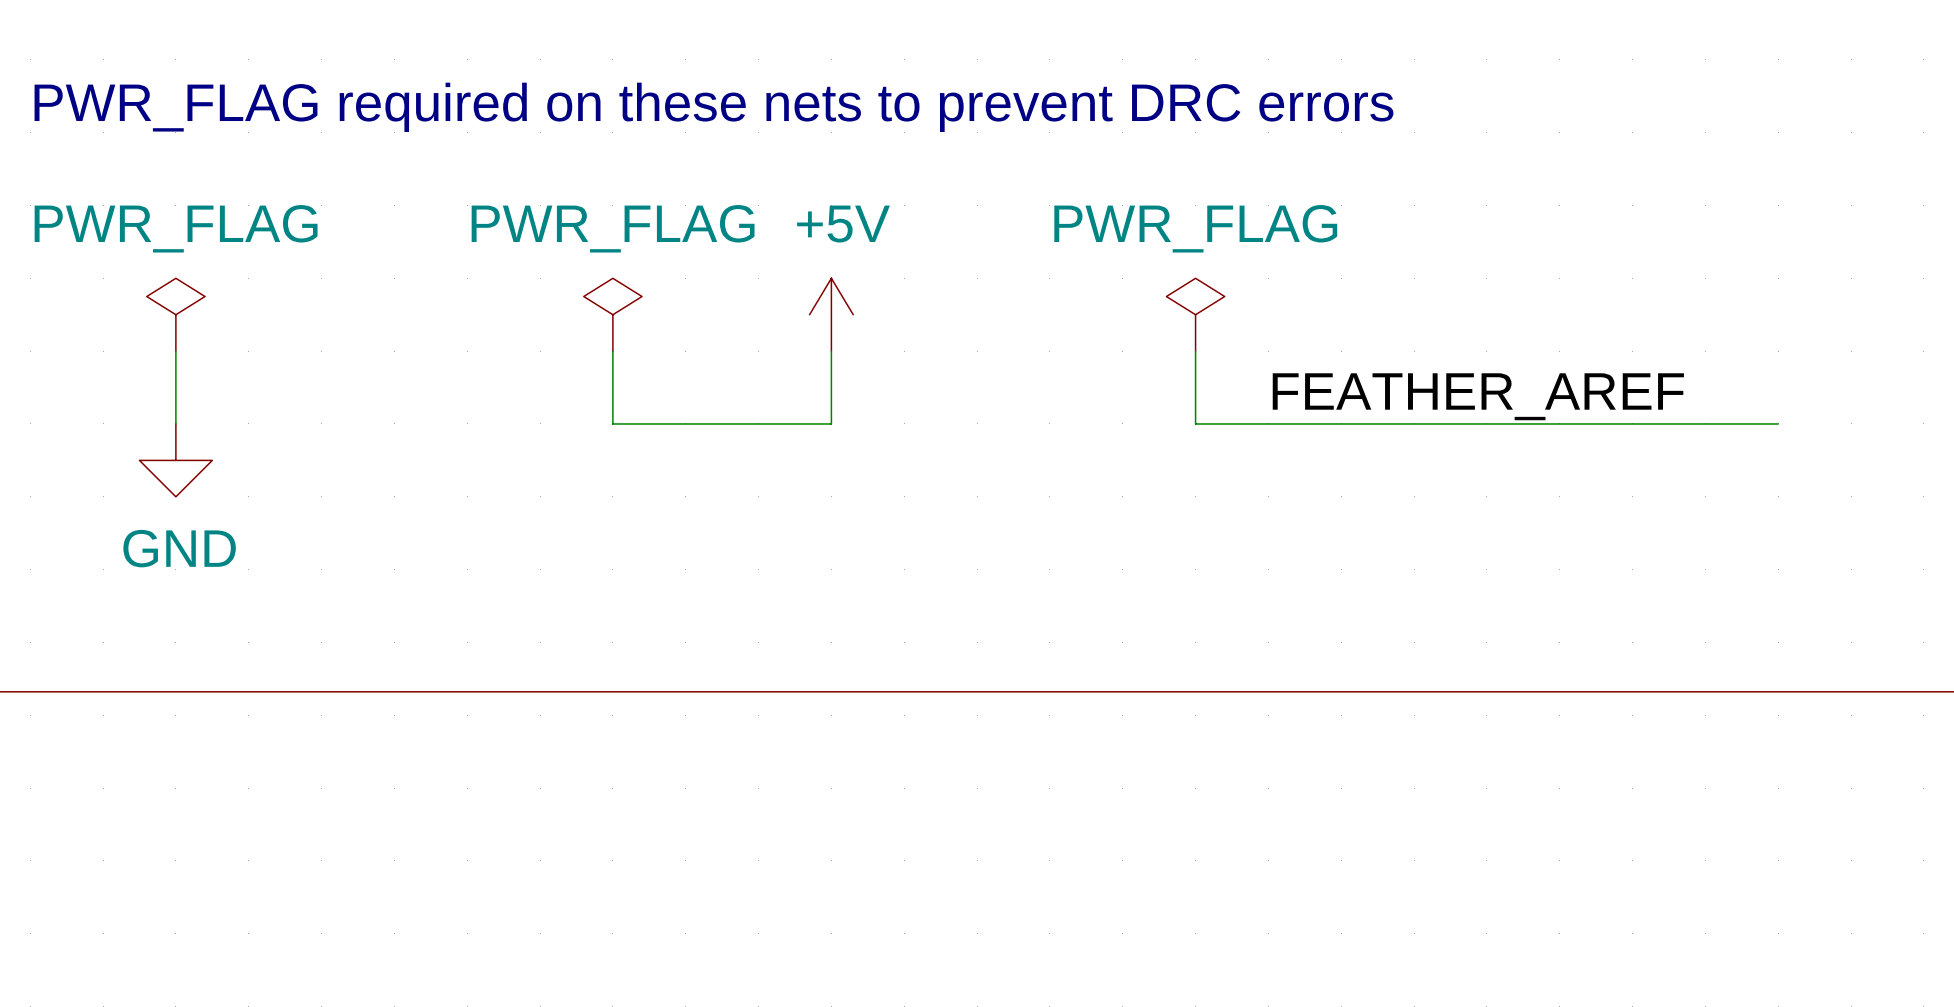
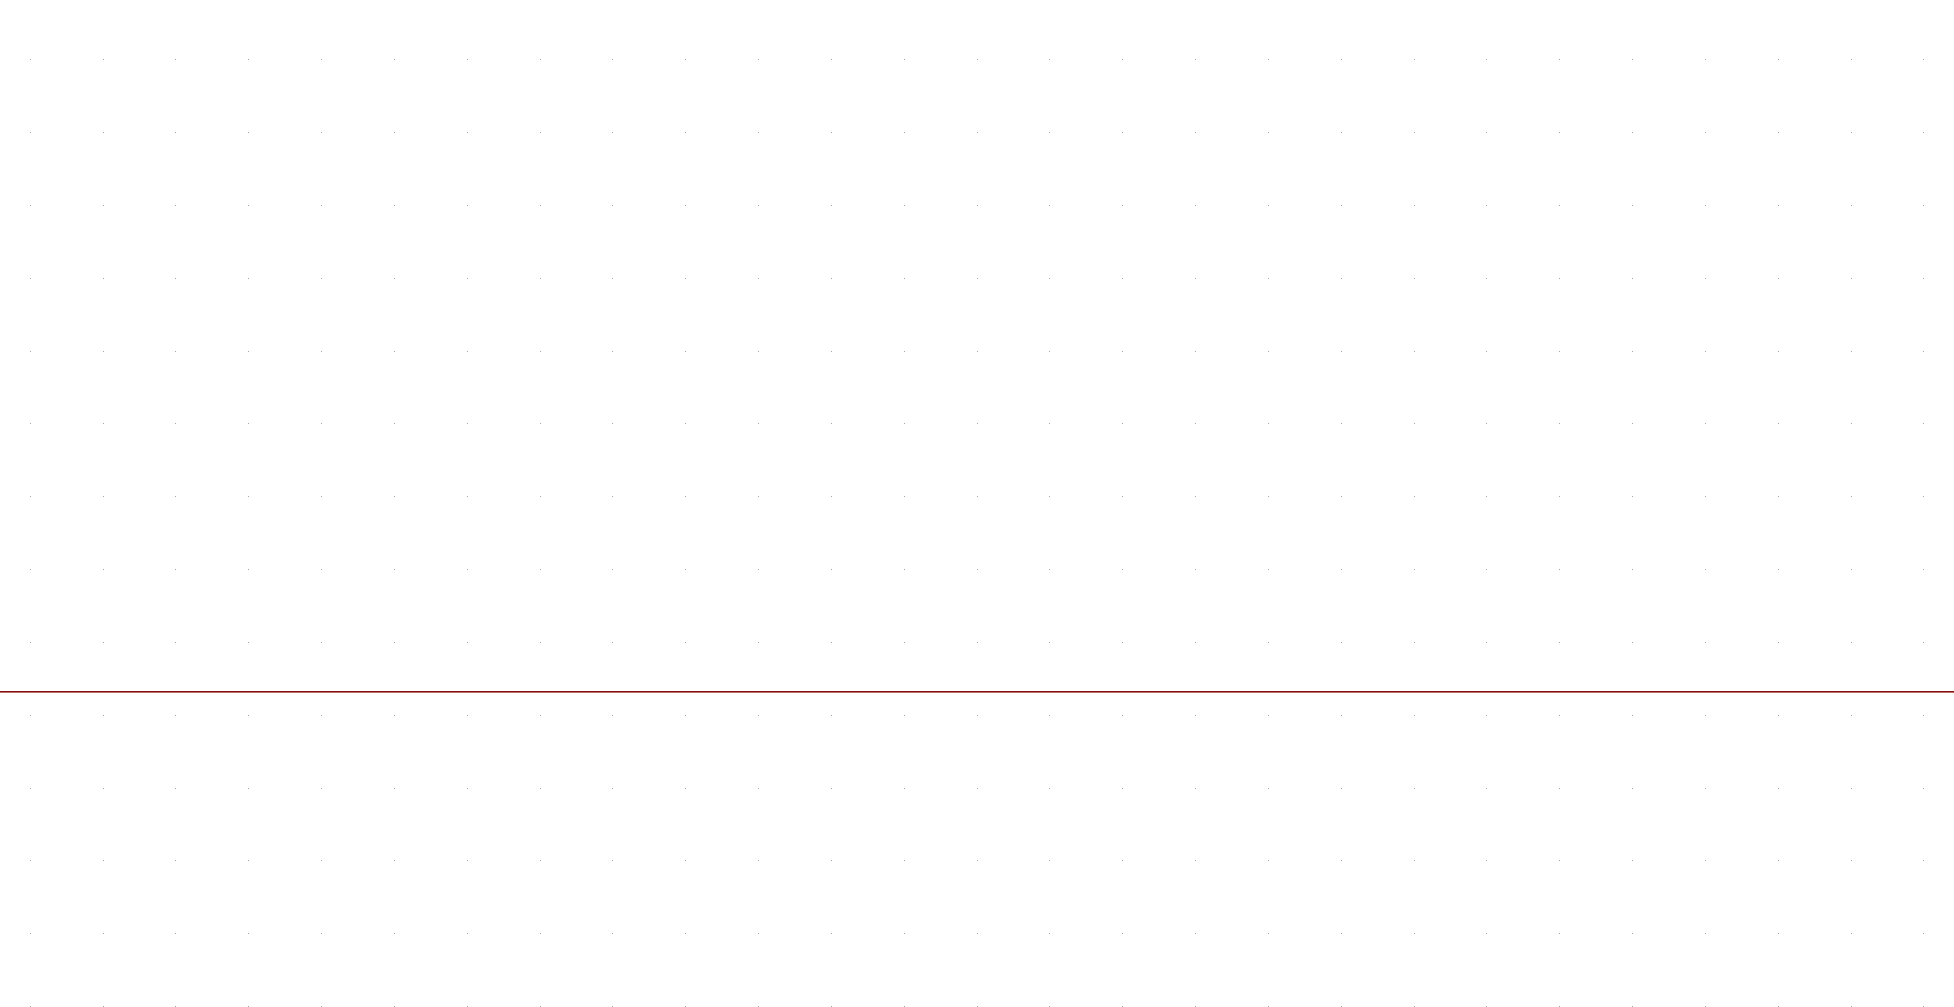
text: PWR_FLAG required on these nets to prevent DRC errors (713, 107) -> none
power symbol: PWR_FLAG (175, 314) -> none
power symbol: PWR_FLAG (612, 314) -> none
power symbol: +5V (831, 314) -> none
power symbol: PWR_FLAG (1195, 314) -> none
wire: (175, 351) (175, 423) -> none
wire: (612, 351) (612, 423) (831, 423) (831, 351) -> none
wire: (1195, 351) (1195, 423) (1778, 423) -> none
label: FEATHER_AREF (1478, 396) -> none
power symbol: GND (175, 460) -> none

